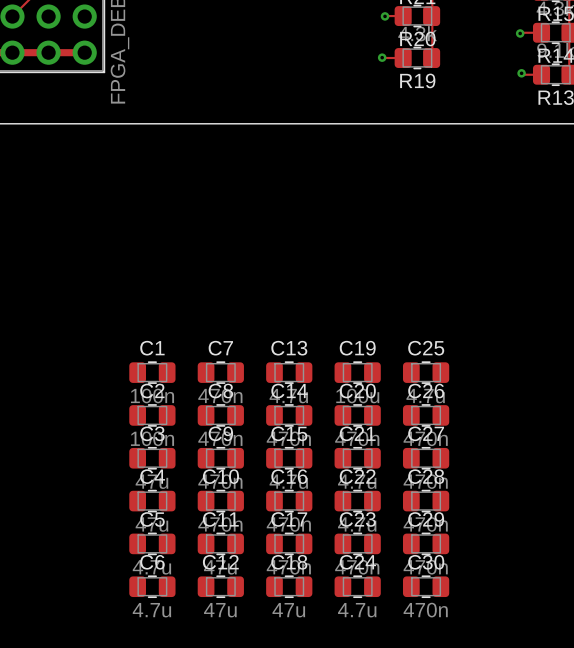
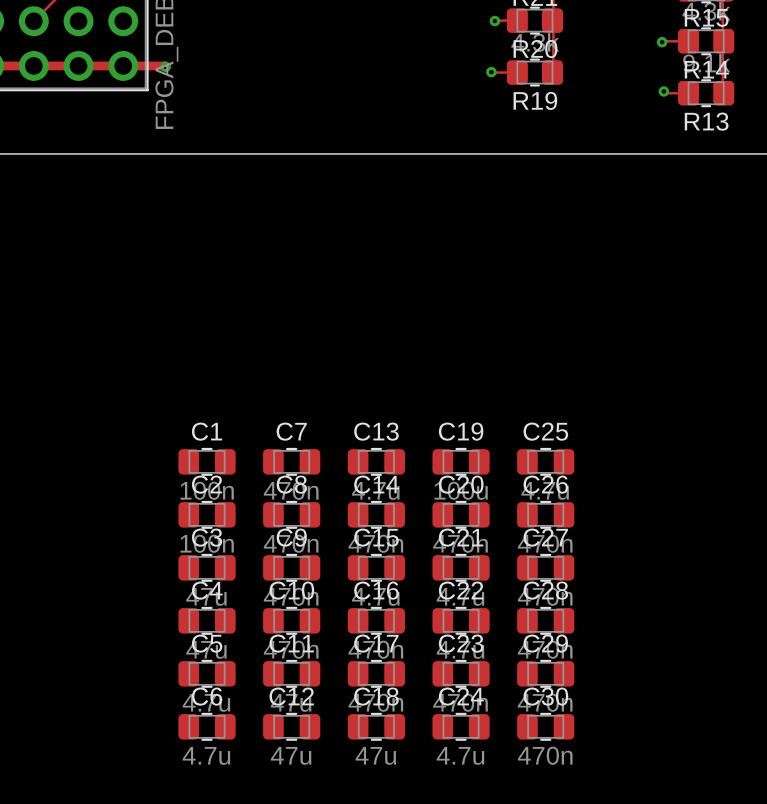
top track: none -> (123, 65) (165, 66)
via: none -> (165, 66)

